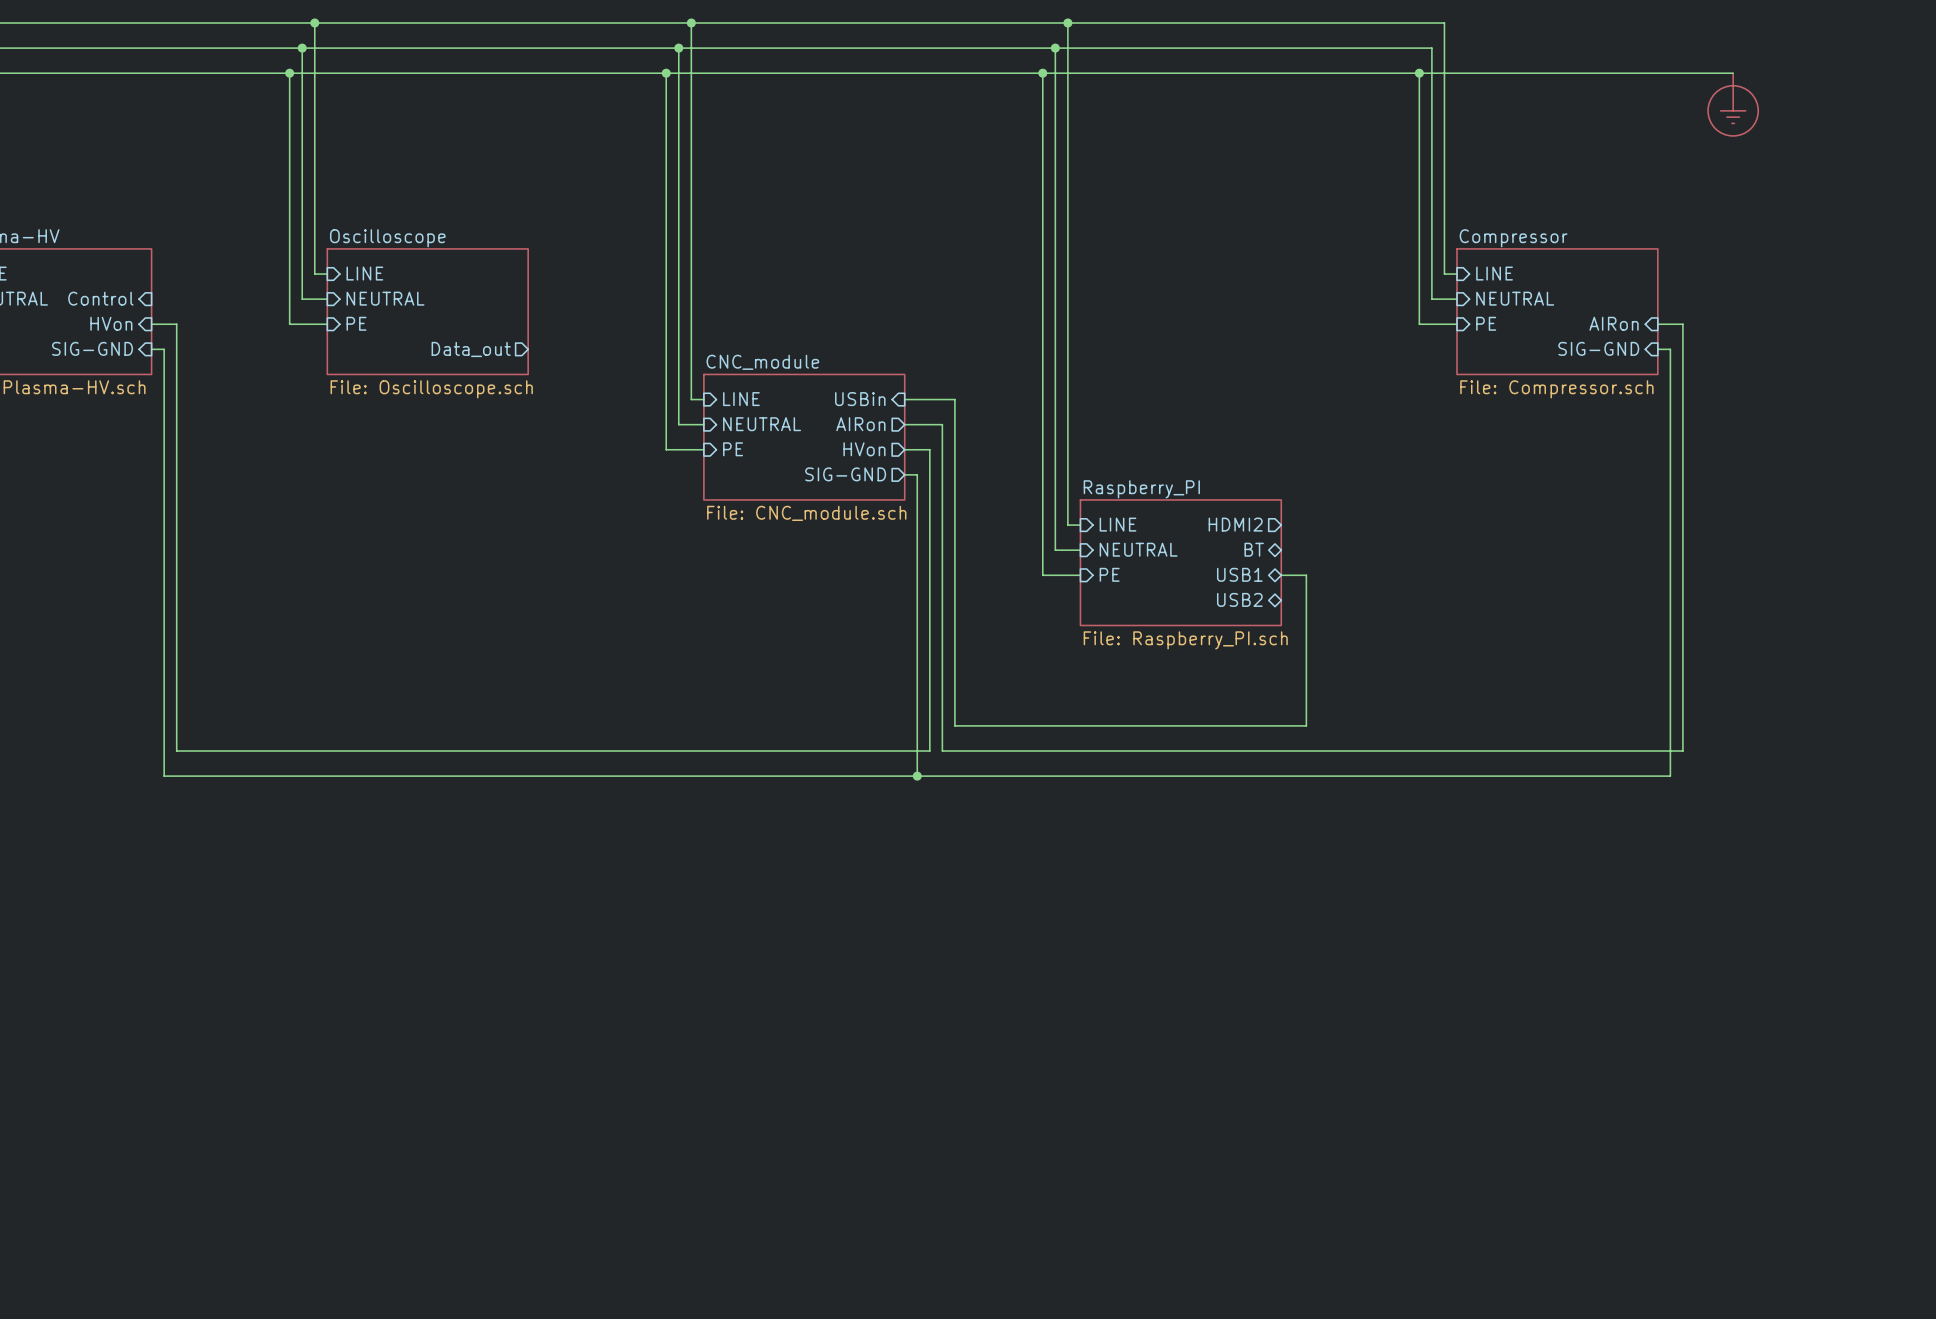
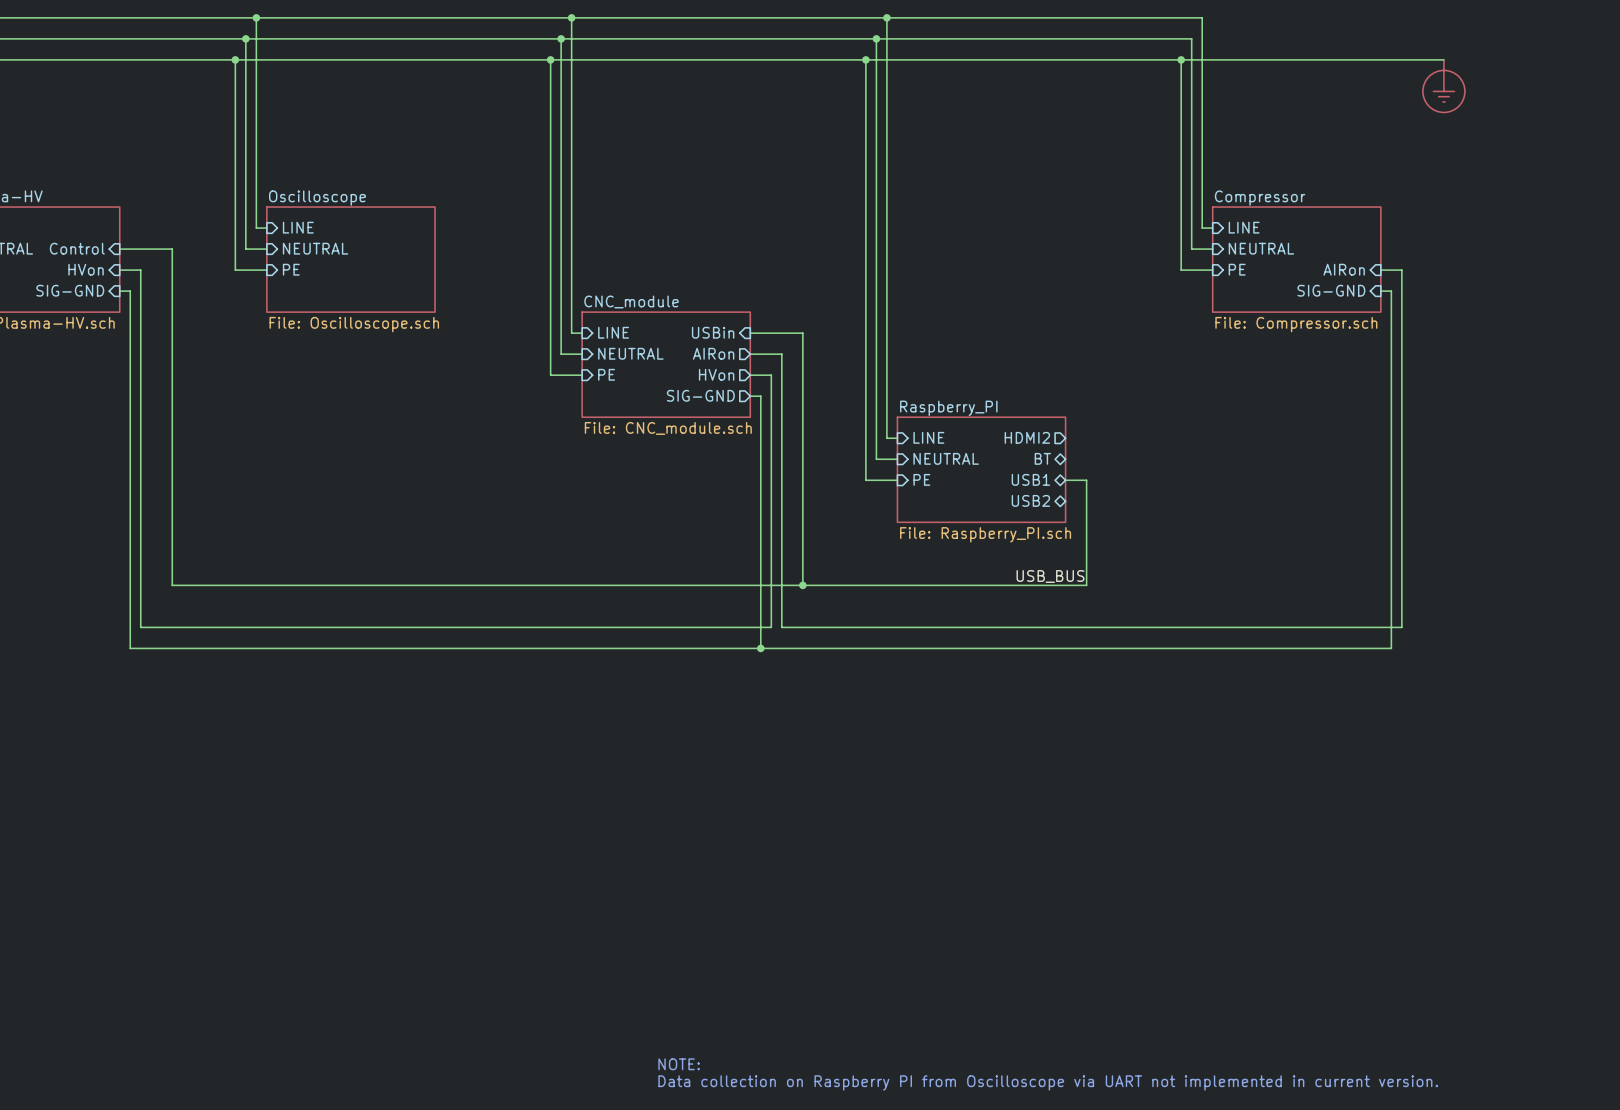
wire: none -> (119, 249) (172, 249) (172, 585) (1086, 585)
sheet pin: Data_out (471, 349) -> none
wire: (954, 399) (954, 725) (1306, 725) (1306, 700) -> (792, 333) (802, 333) (802, 585)
label: none -> USB_BUS (1050, 576)
junction: none -> (802, 585)
text: none -> NOTE: (679, 1064)
text: none -> Data collection on Raspberry PI from Oscilloscope via UART not implemented in current version. (1048, 1082)

